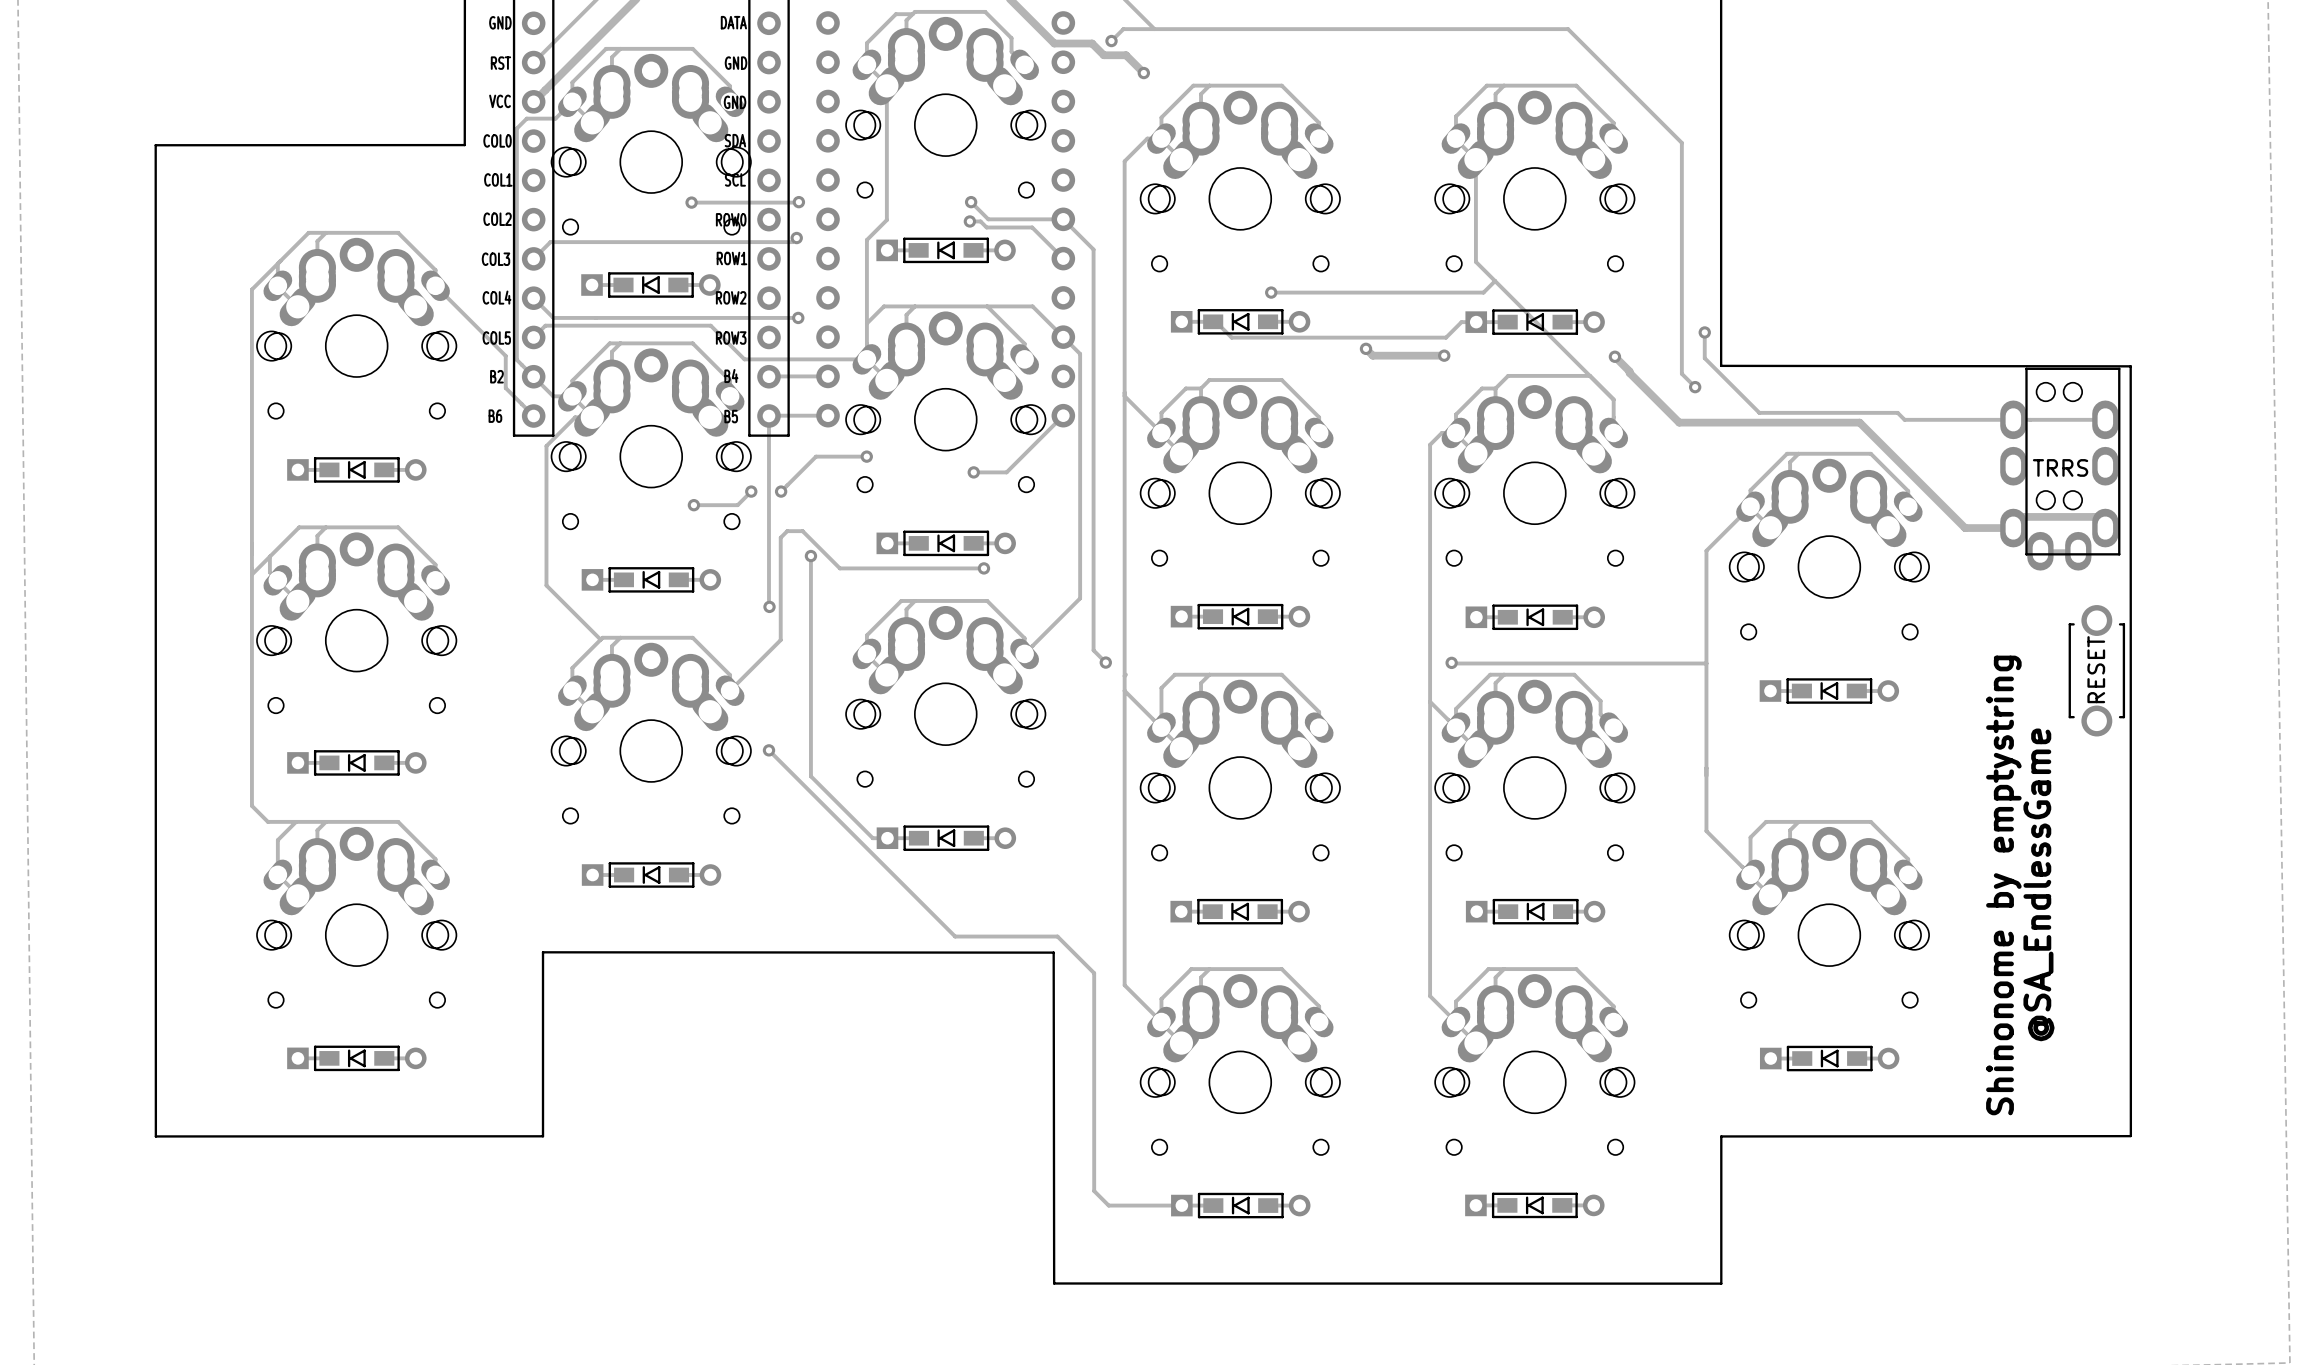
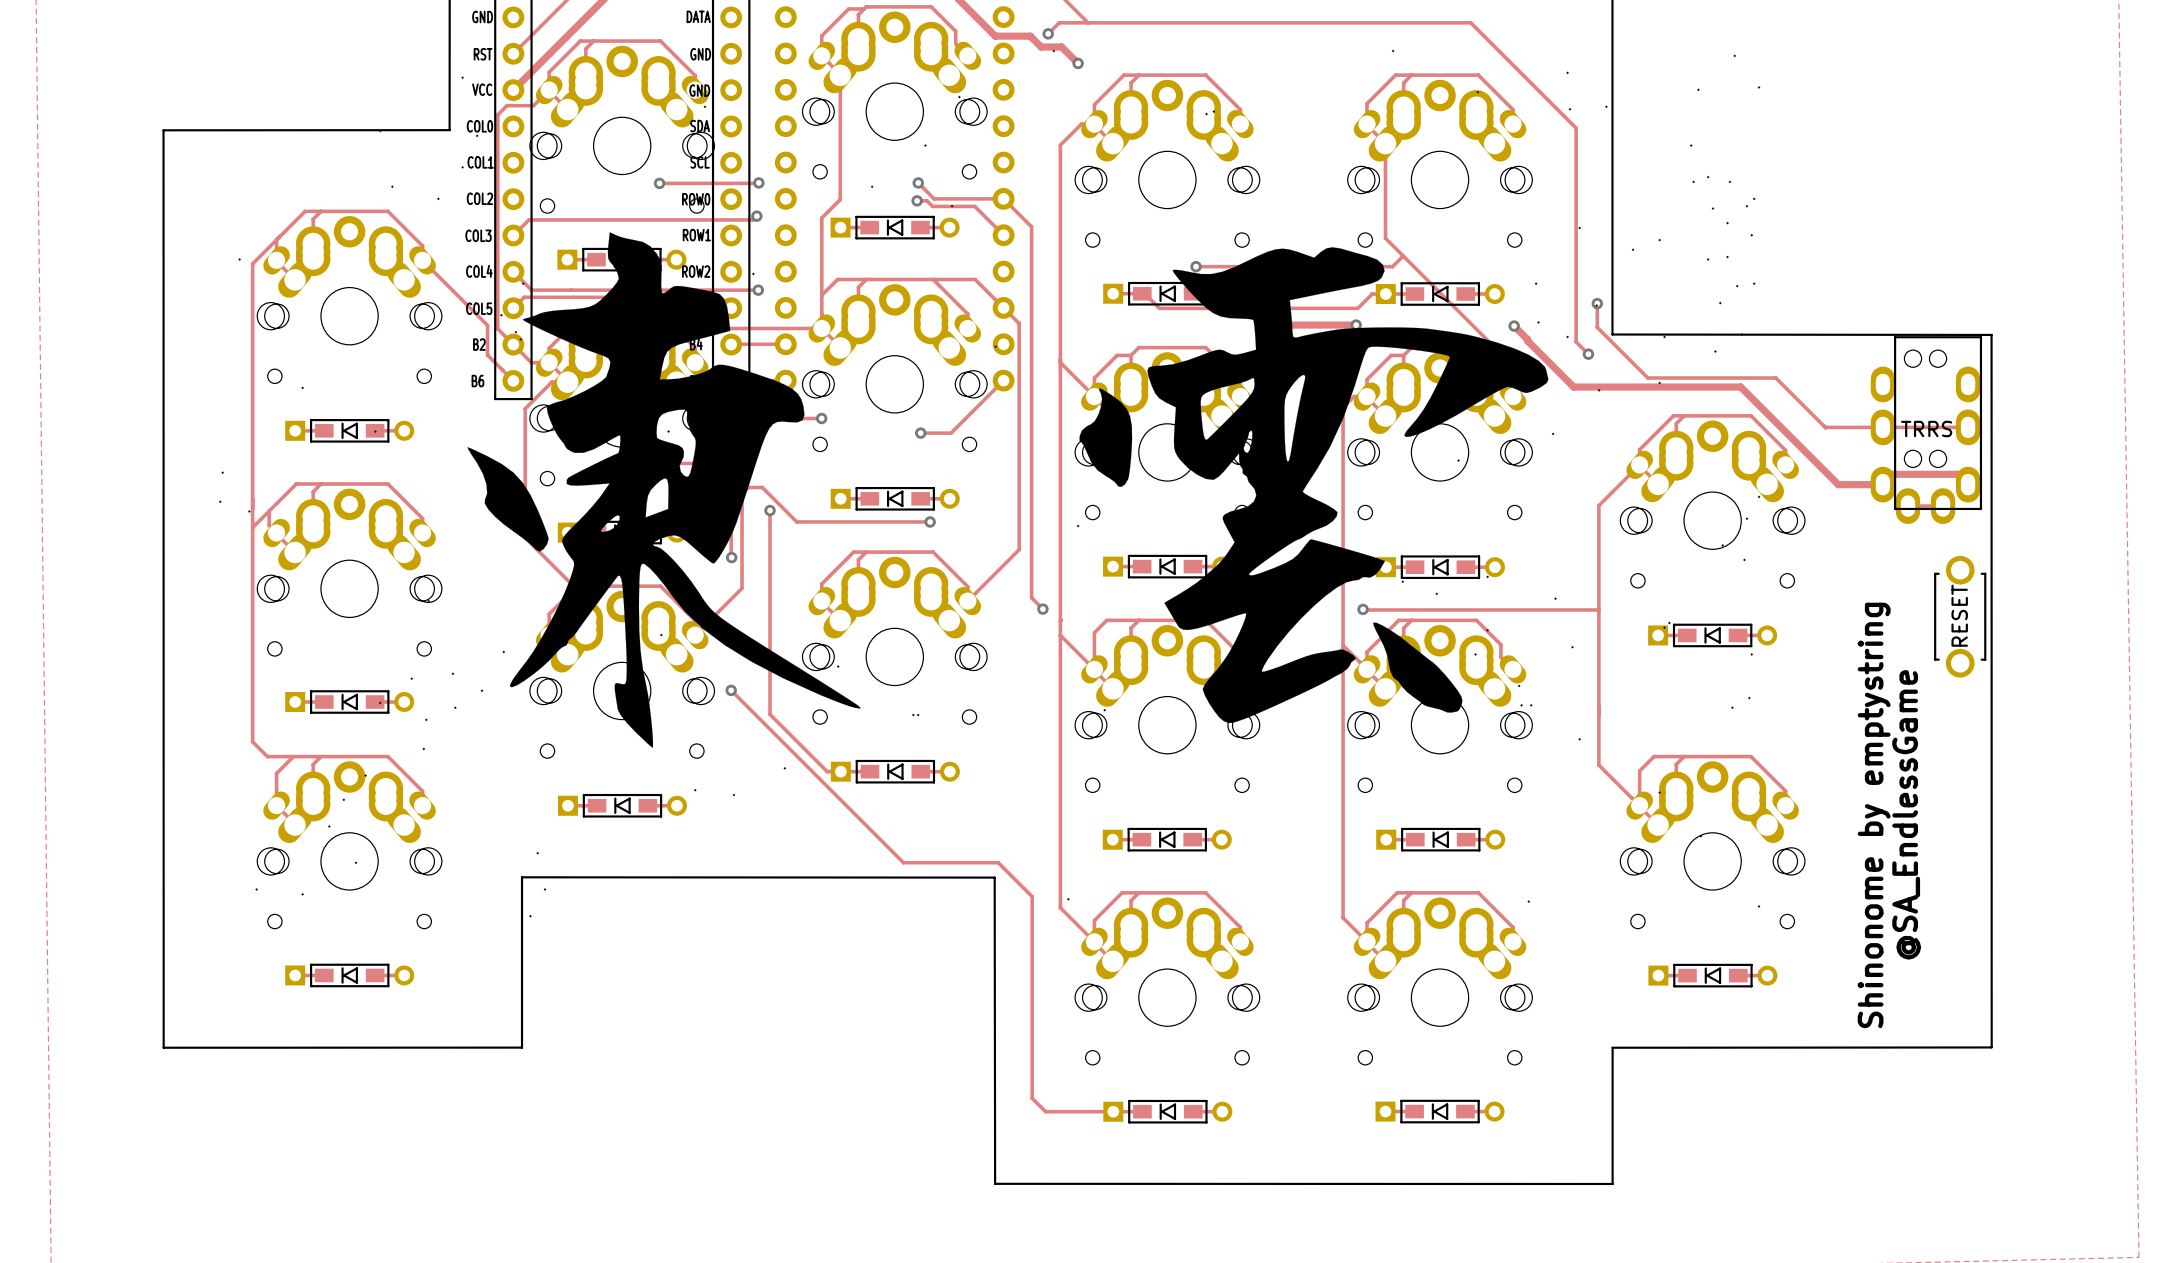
drawing: none -> [219, 49, 1761, 918]
track: (1904, 419) (2105, 419) -> (1782, 384) (1825, 427)
track: none -> (1825, 427) (1968, 427)

